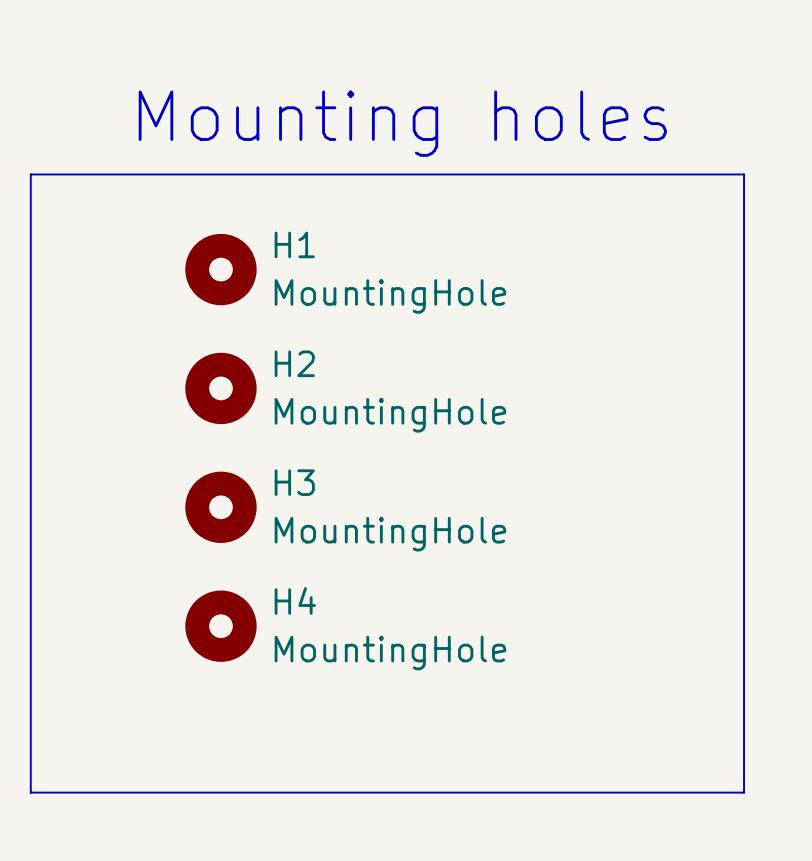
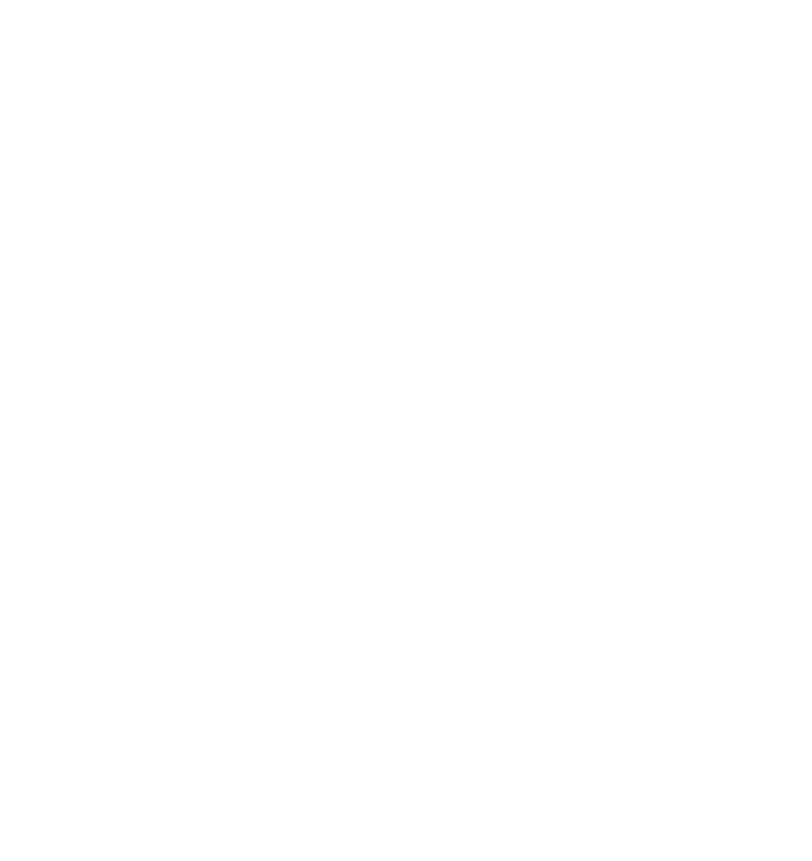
text: Mounting holes (402, 123) -> none
line: (30, 174) (744, 174) (744, 792) (30, 792) (30, 174) -> none
H1: MountingHole (220, 269) -> none
H2: MountingHole (220, 388) -> none
H3: MountingHole (220, 507) -> none
H4: MountingHole (220, 626) -> none

